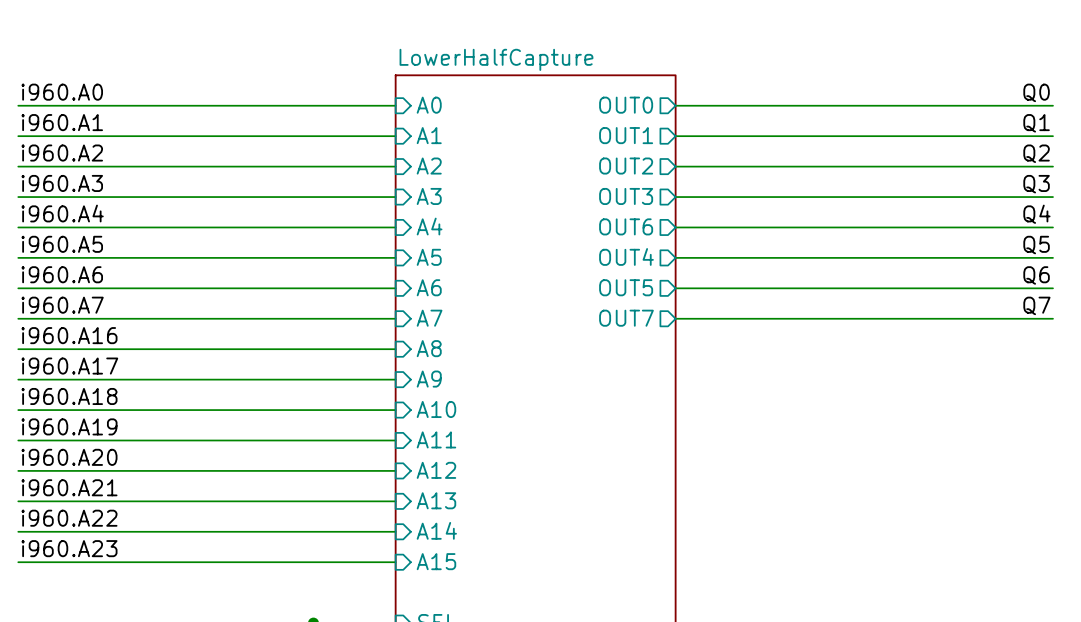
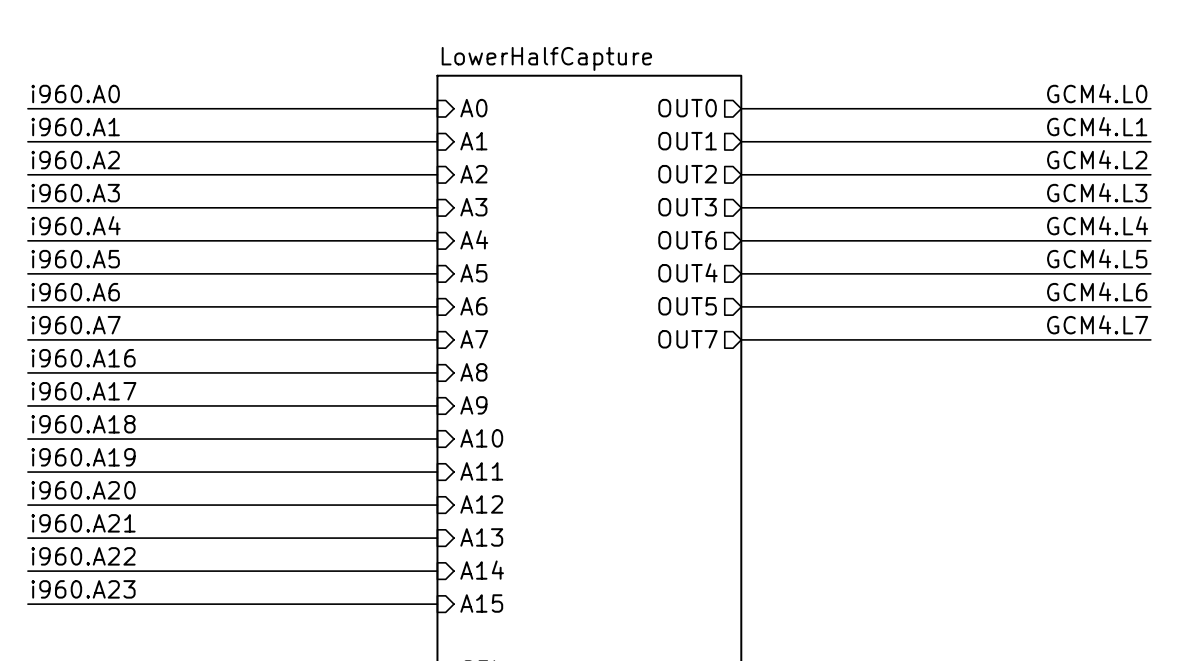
label: Q0 (1036, 92) -> GCM4.L0 (1097, 93)
label: Q1 (1036, 123) -> GCM4.L1 (1097, 126)
label: Q2 (1036, 153) -> GCM4.L2 (1097, 159)
label: Q3 (1036, 184) -> GCM4.L3 (1097, 192)
label: Q4 (1036, 214) -> GCM4.L4 (1097, 225)
label: Q5 (1036, 245) -> GCM4.L5 (1097, 258)
label: Q6 (1036, 275) -> GCM4.L6 (1097, 291)
label: Q7 (1036, 305) -> GCM4.L7 (1097, 324)

